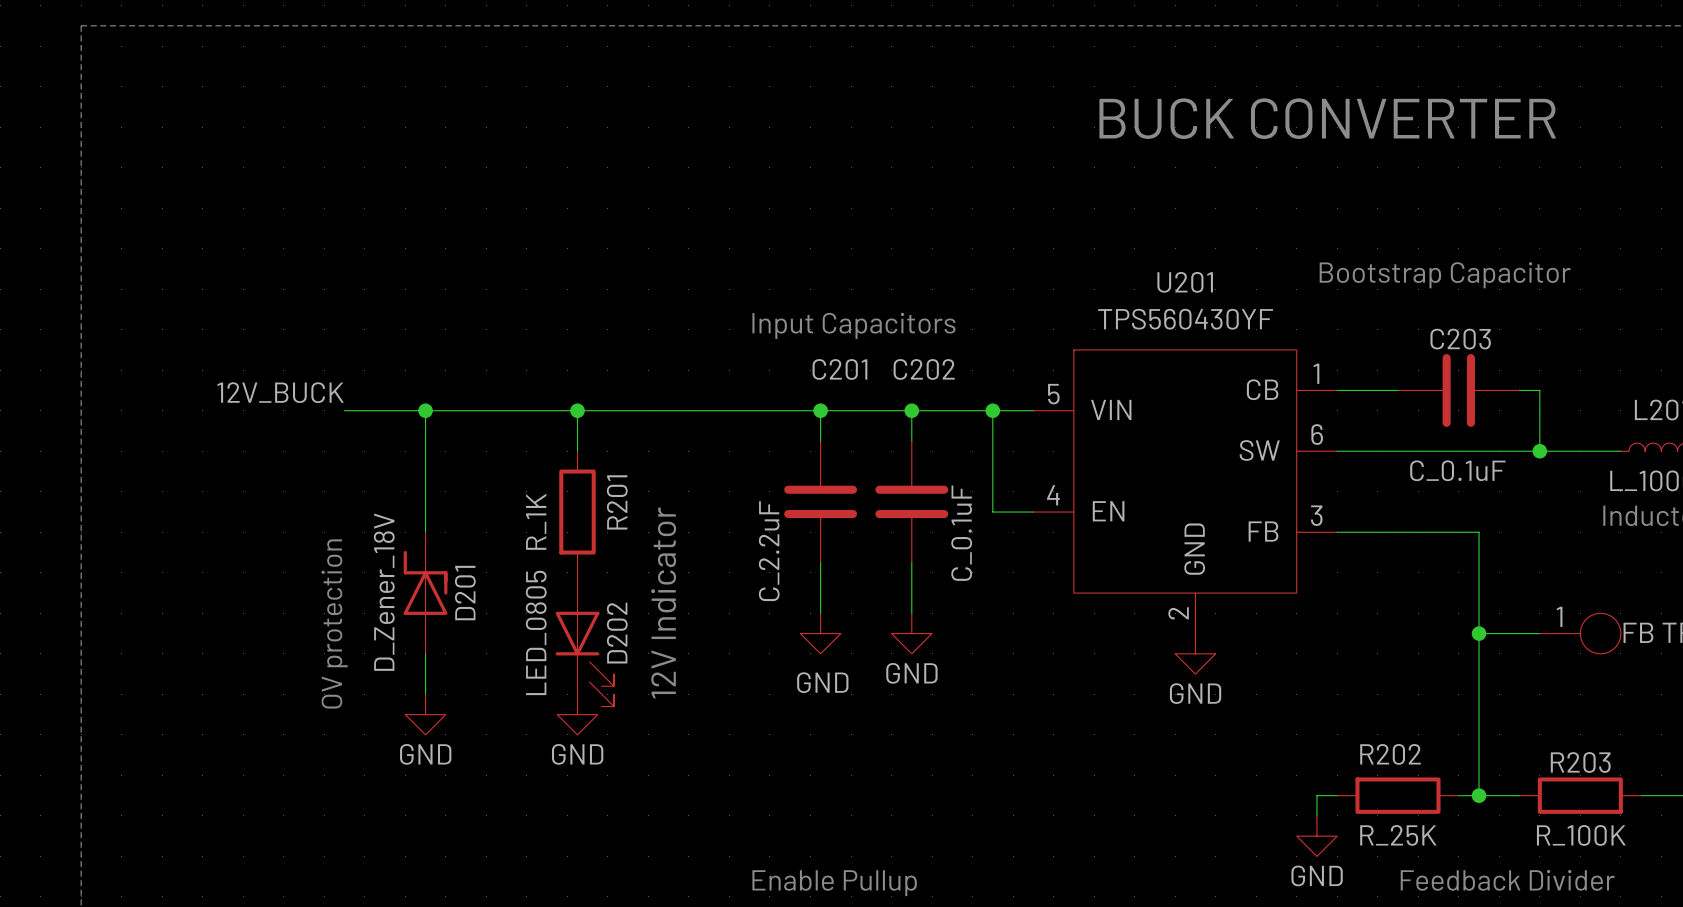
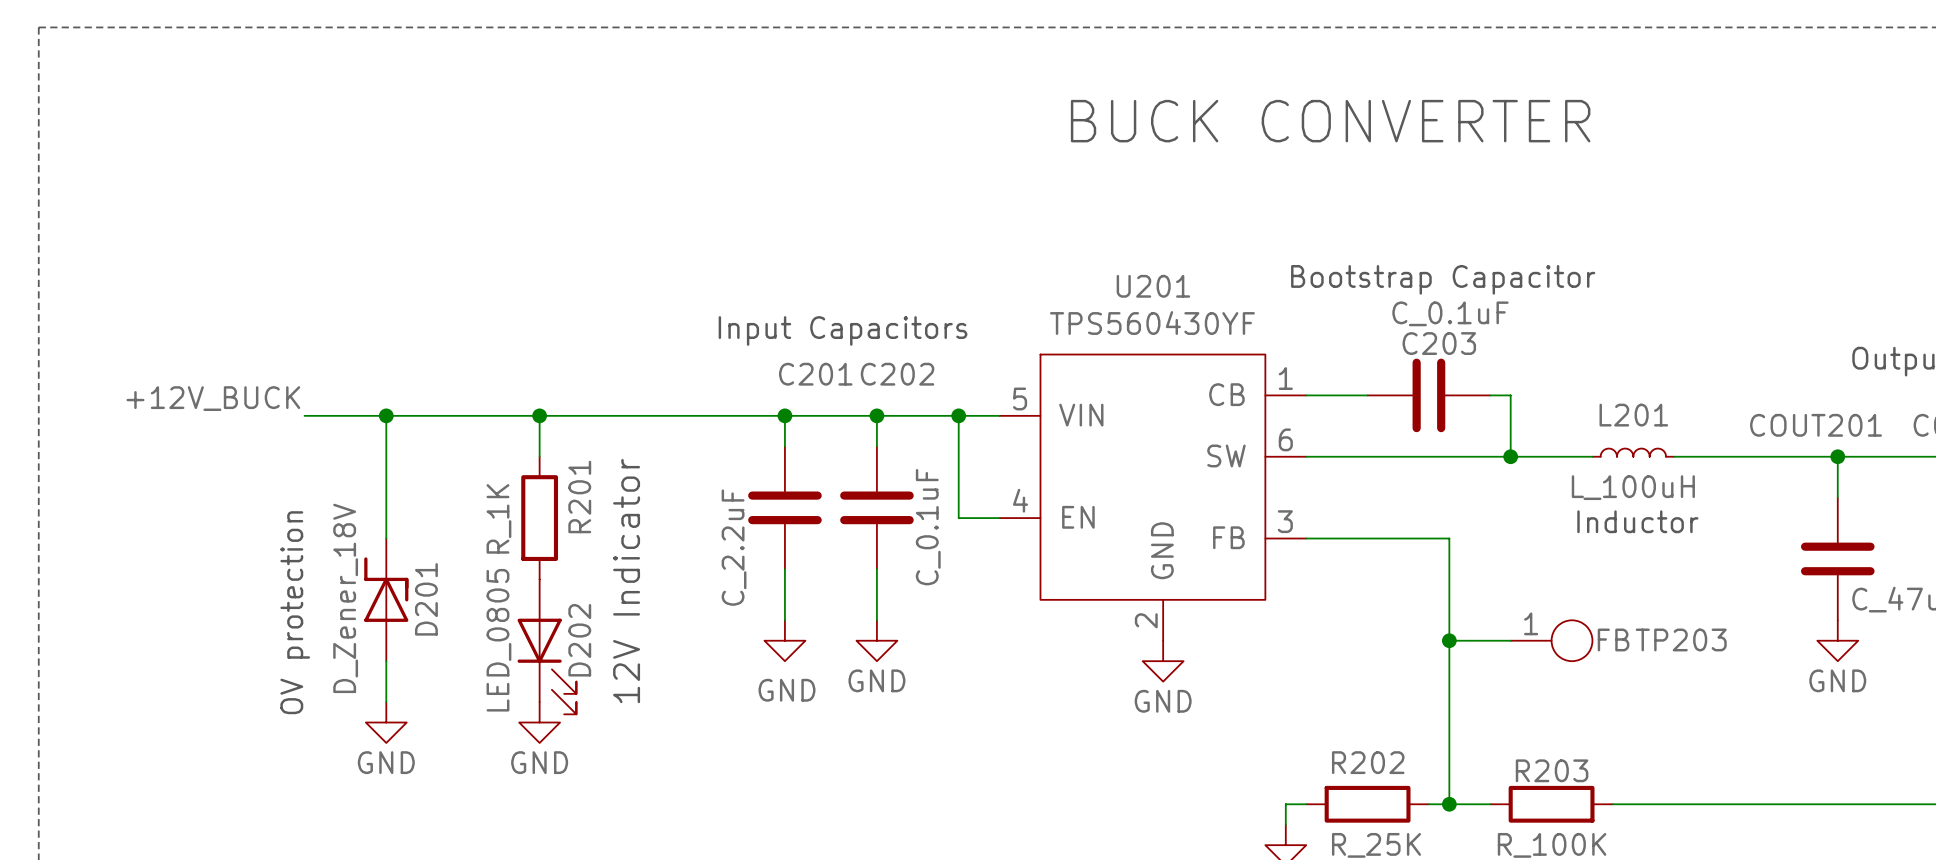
label: 12V_BUCK (280, 392) -> +12V_BUCK (213, 398)
C203 value position: C_0.1uF (1457, 470) -> C_0.1uF (1450, 313)

